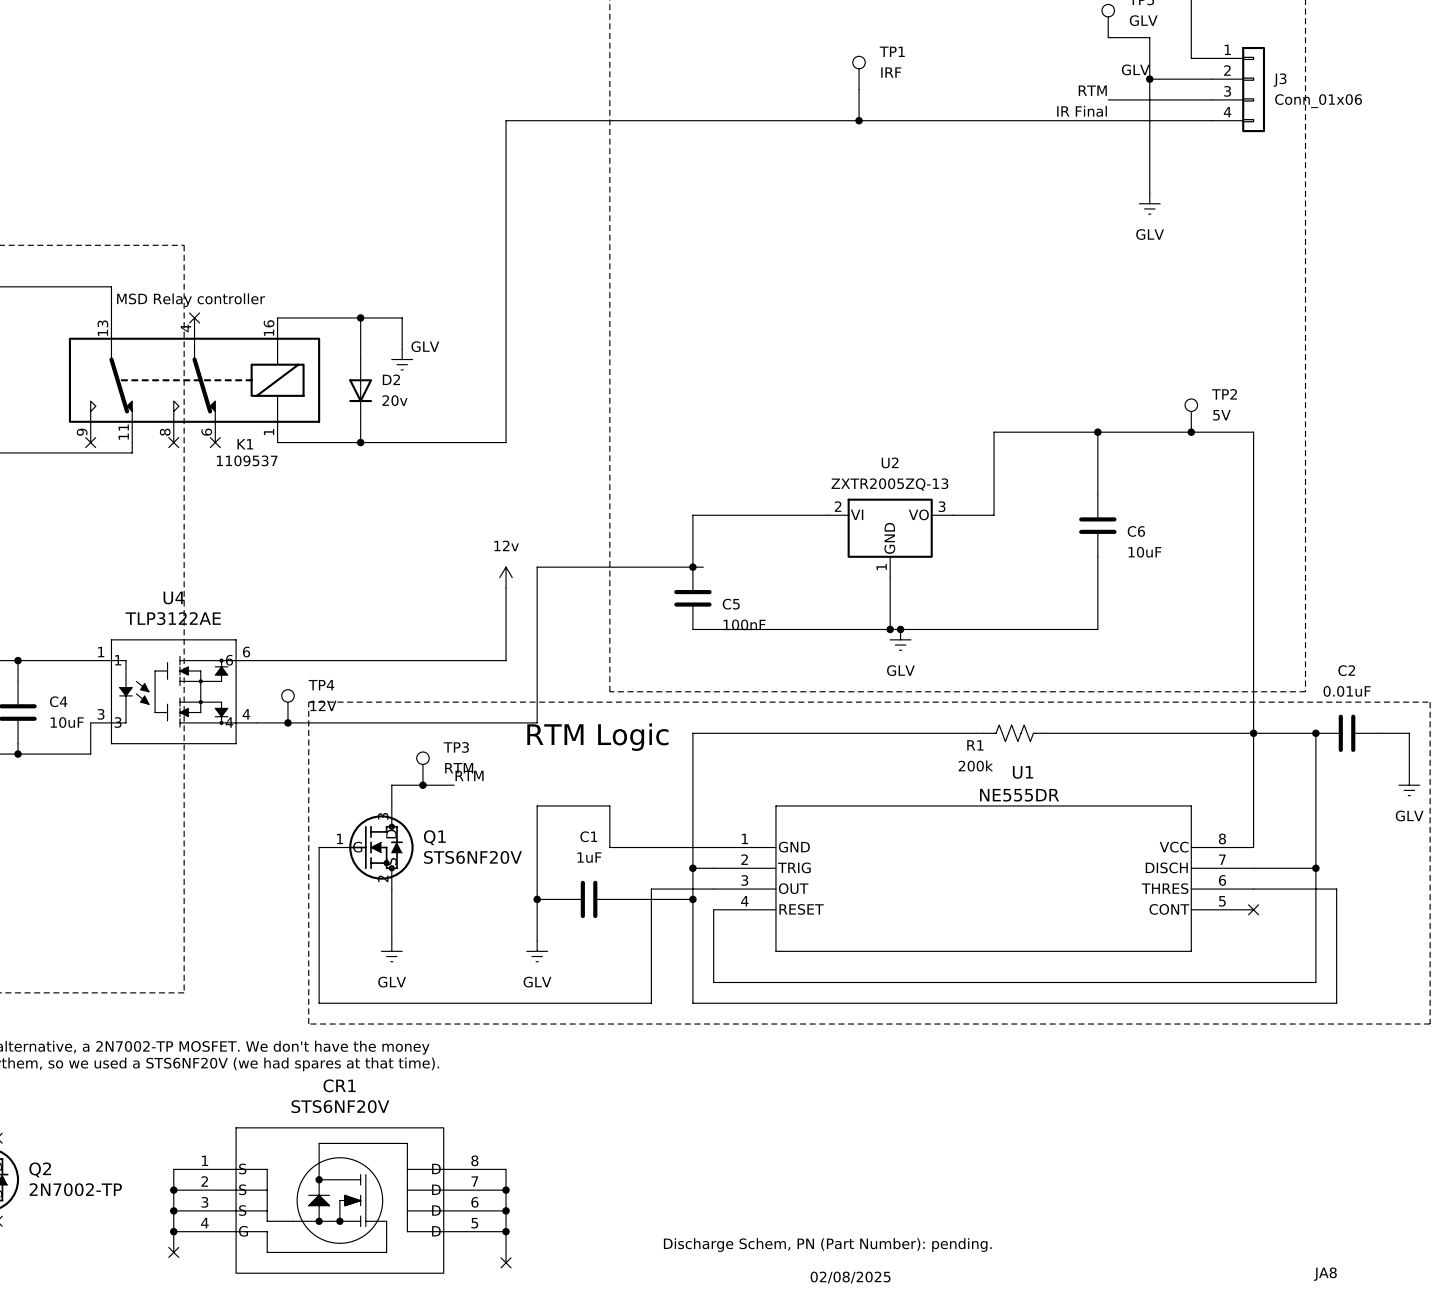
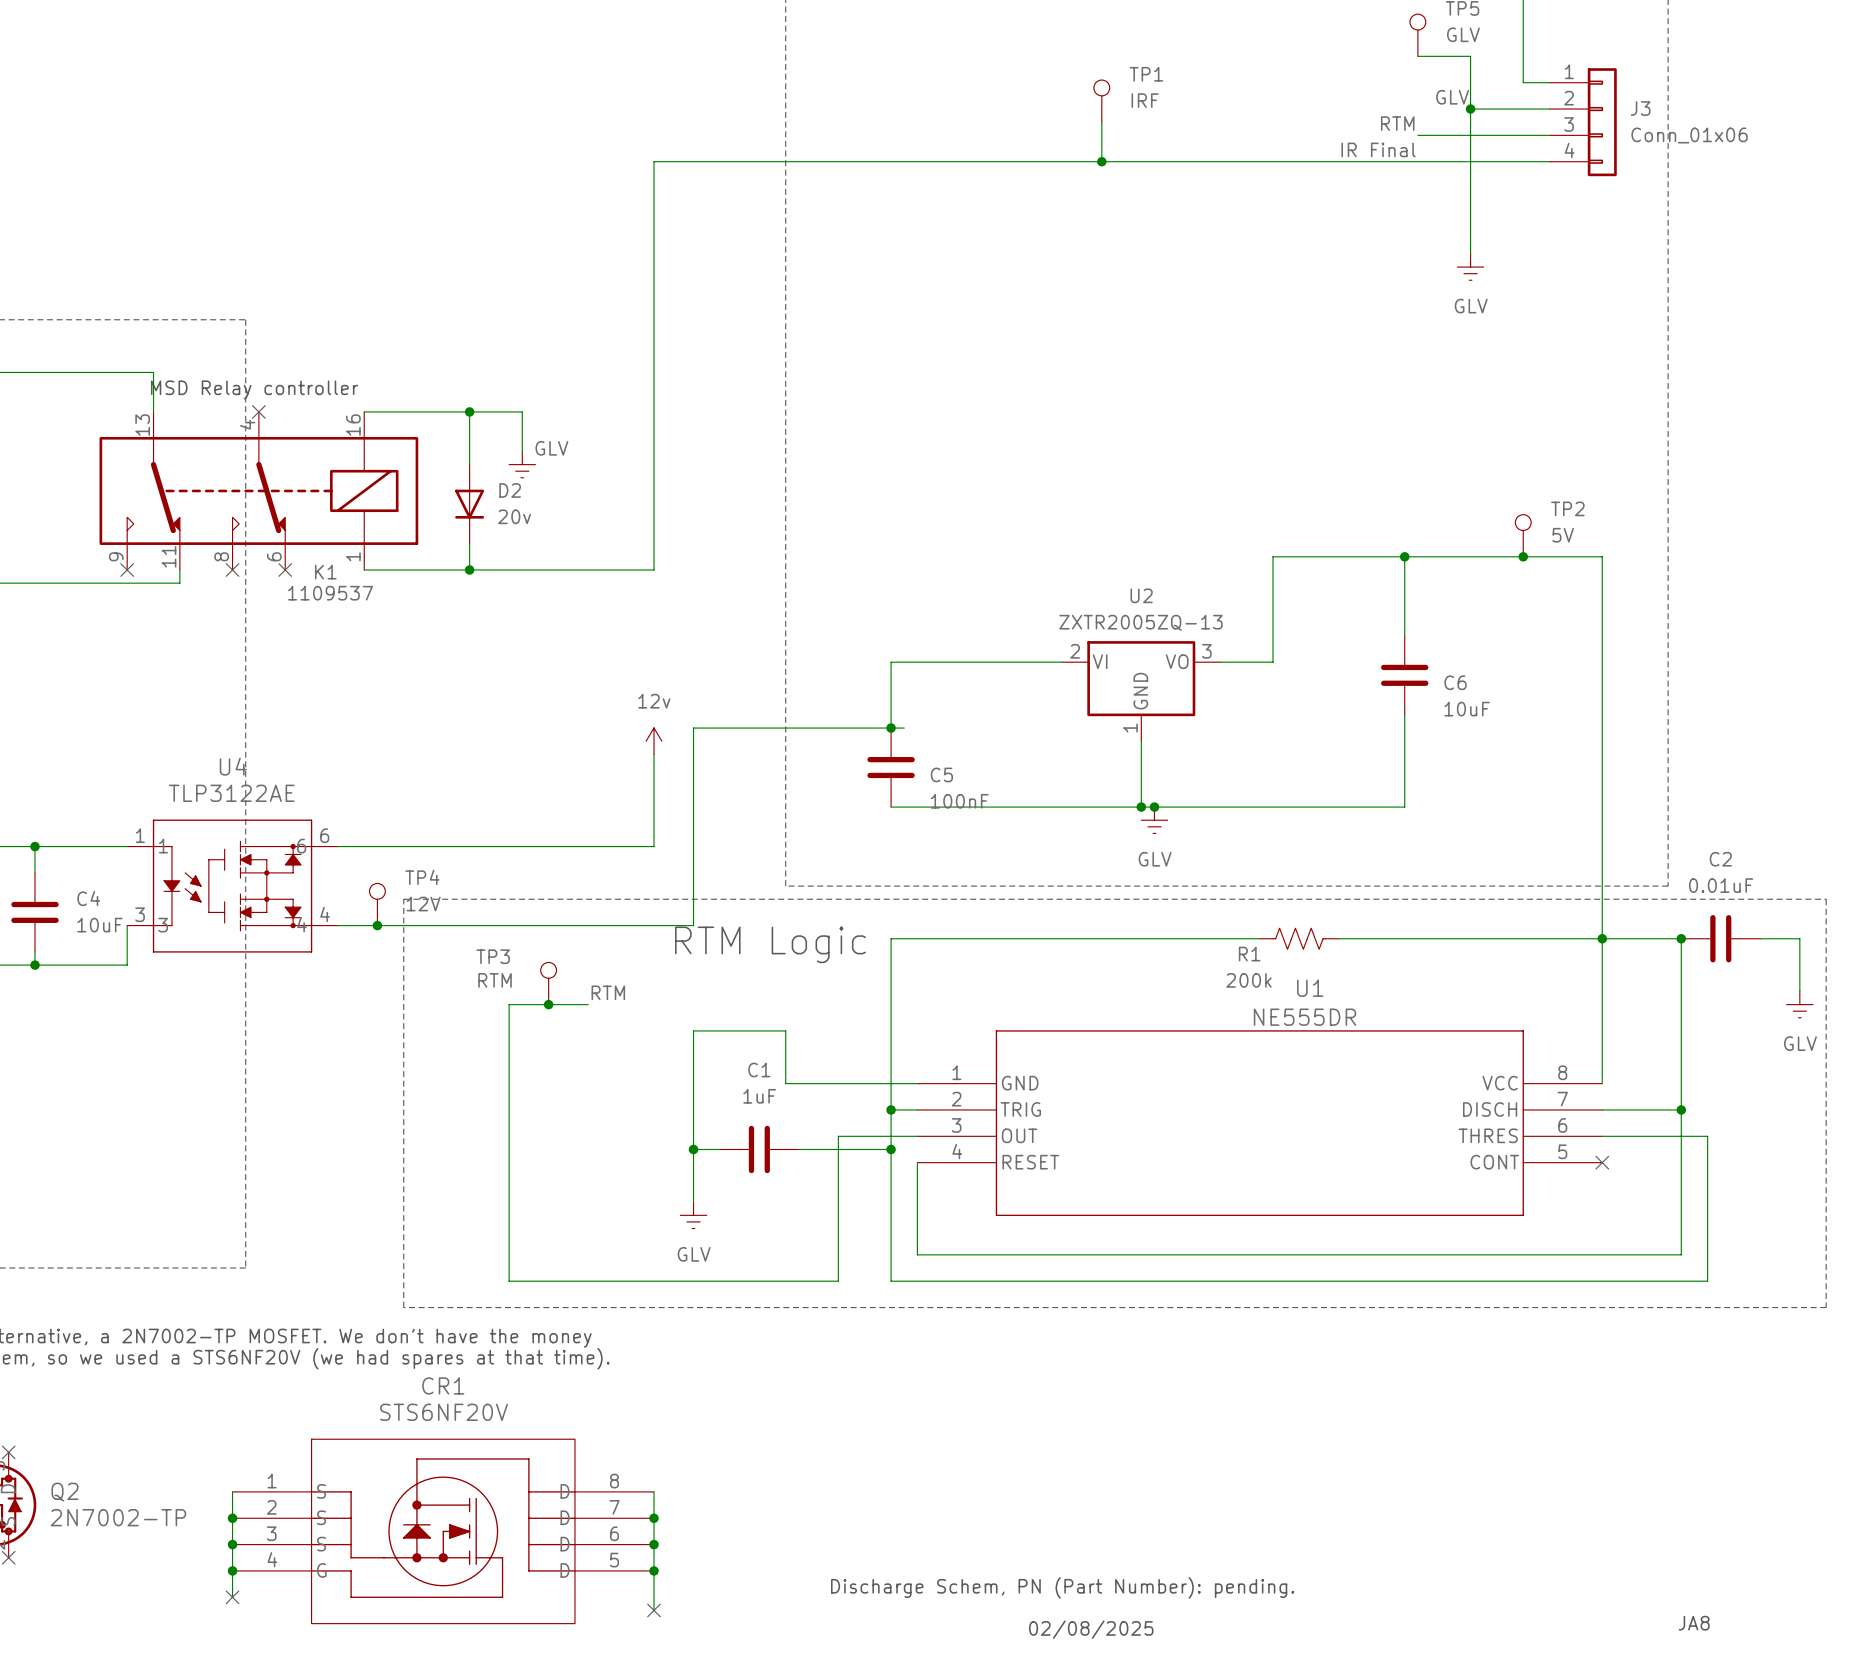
TP3 name position: TP3 (456, 747) -> TP3 (493, 956)
TP3 value position: RTM (459, 768) -> RTM (495, 980)
wire: (329, 847) (319, 847) (319, 1003) (391, 1003) -> (509, 1202) (509, 1281)
Q1: STS6NF20V (371, 847) -> none
power symbol: GLV (391, 951) -> none

